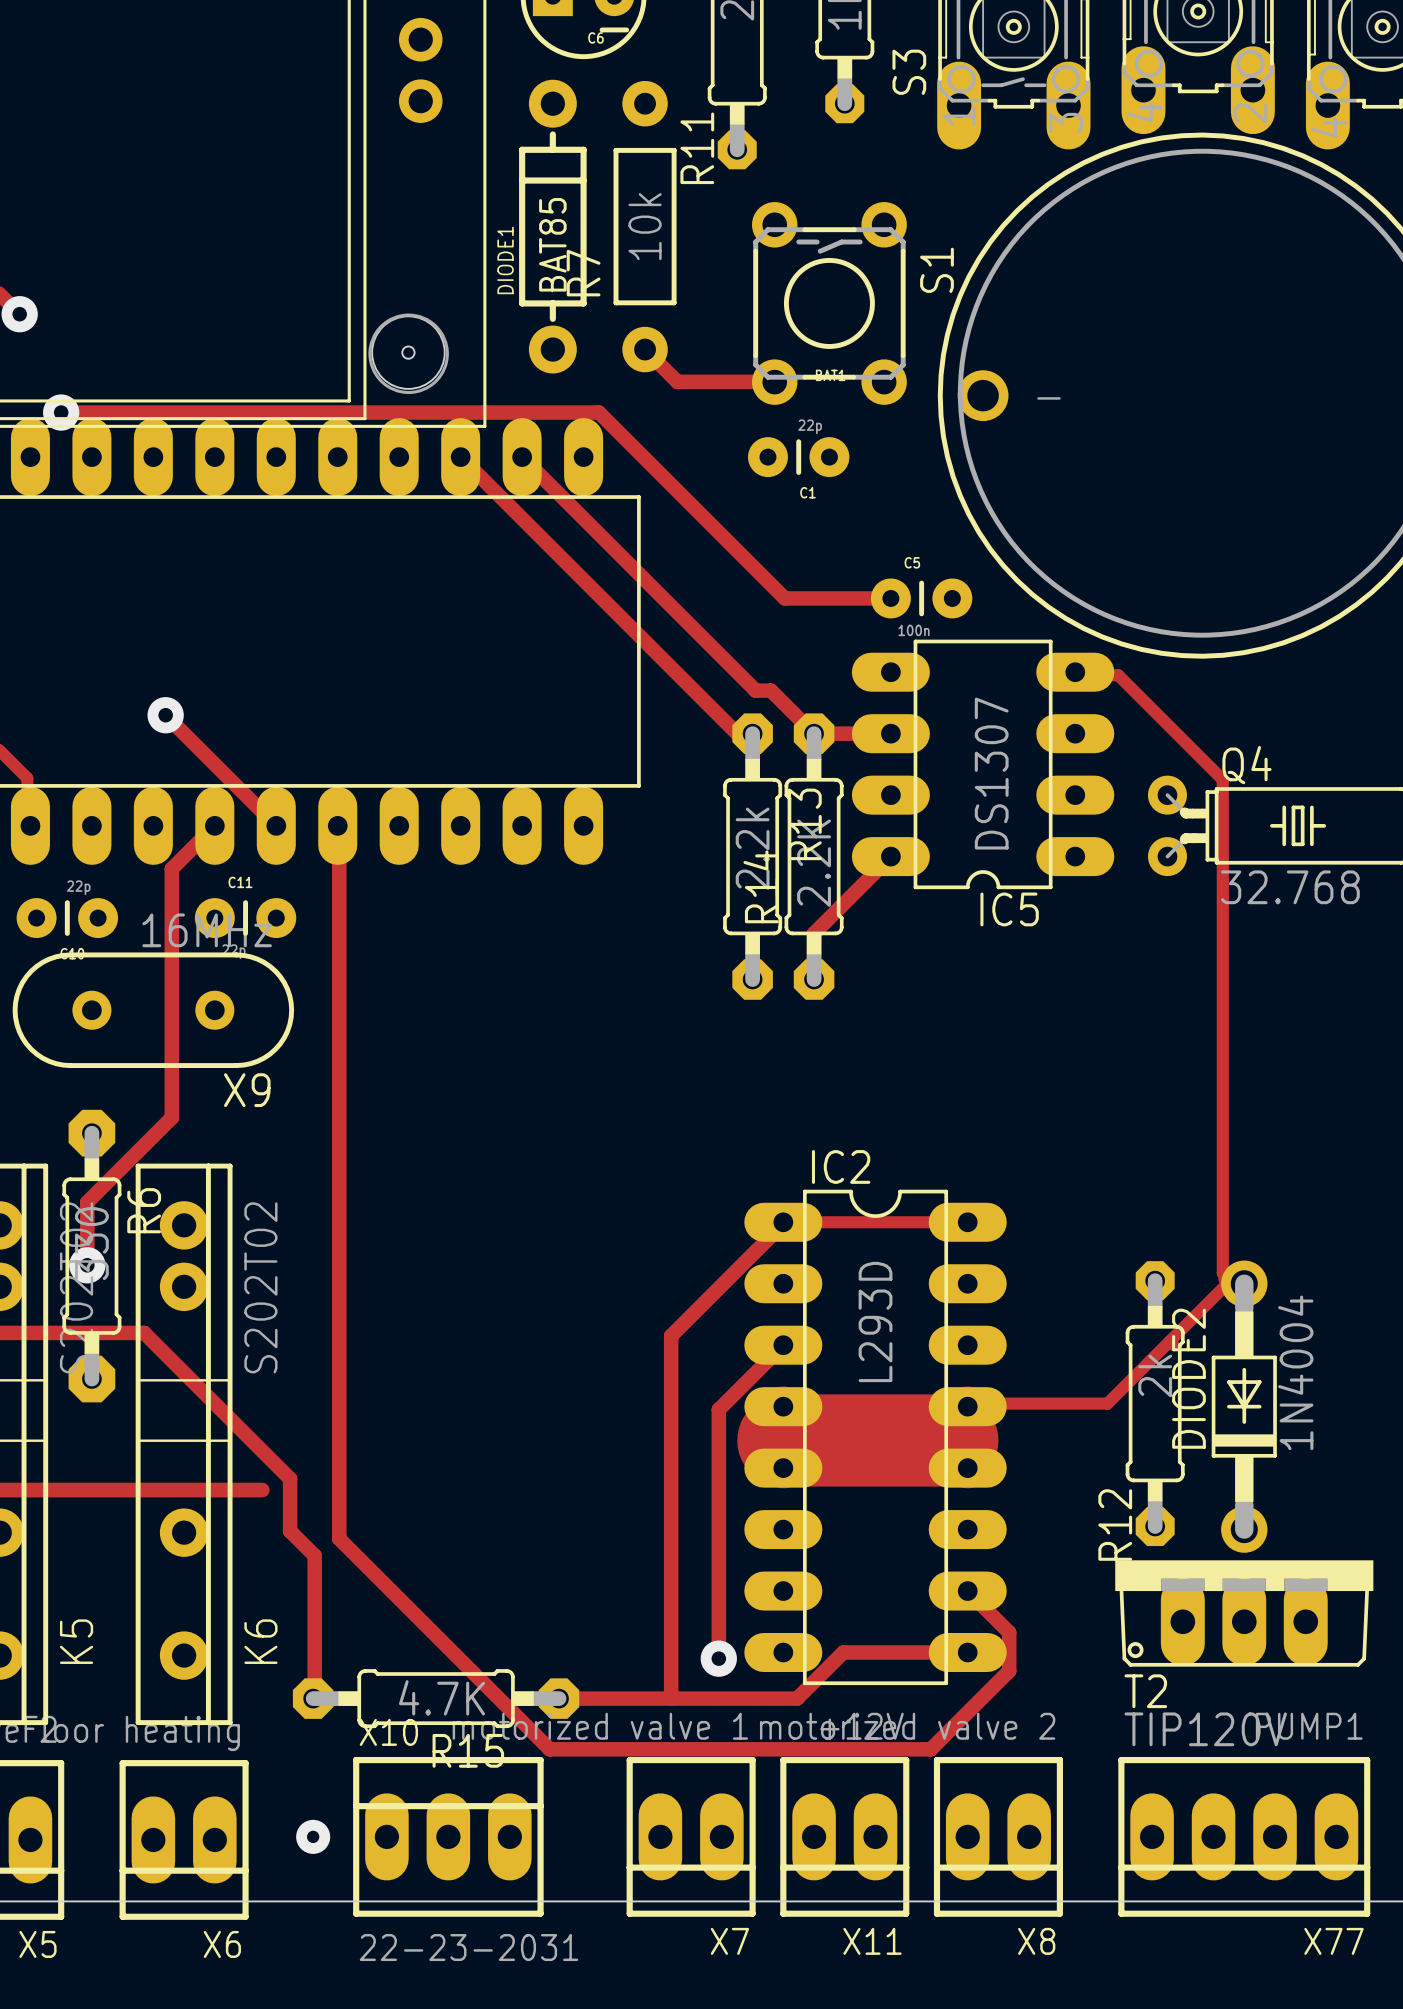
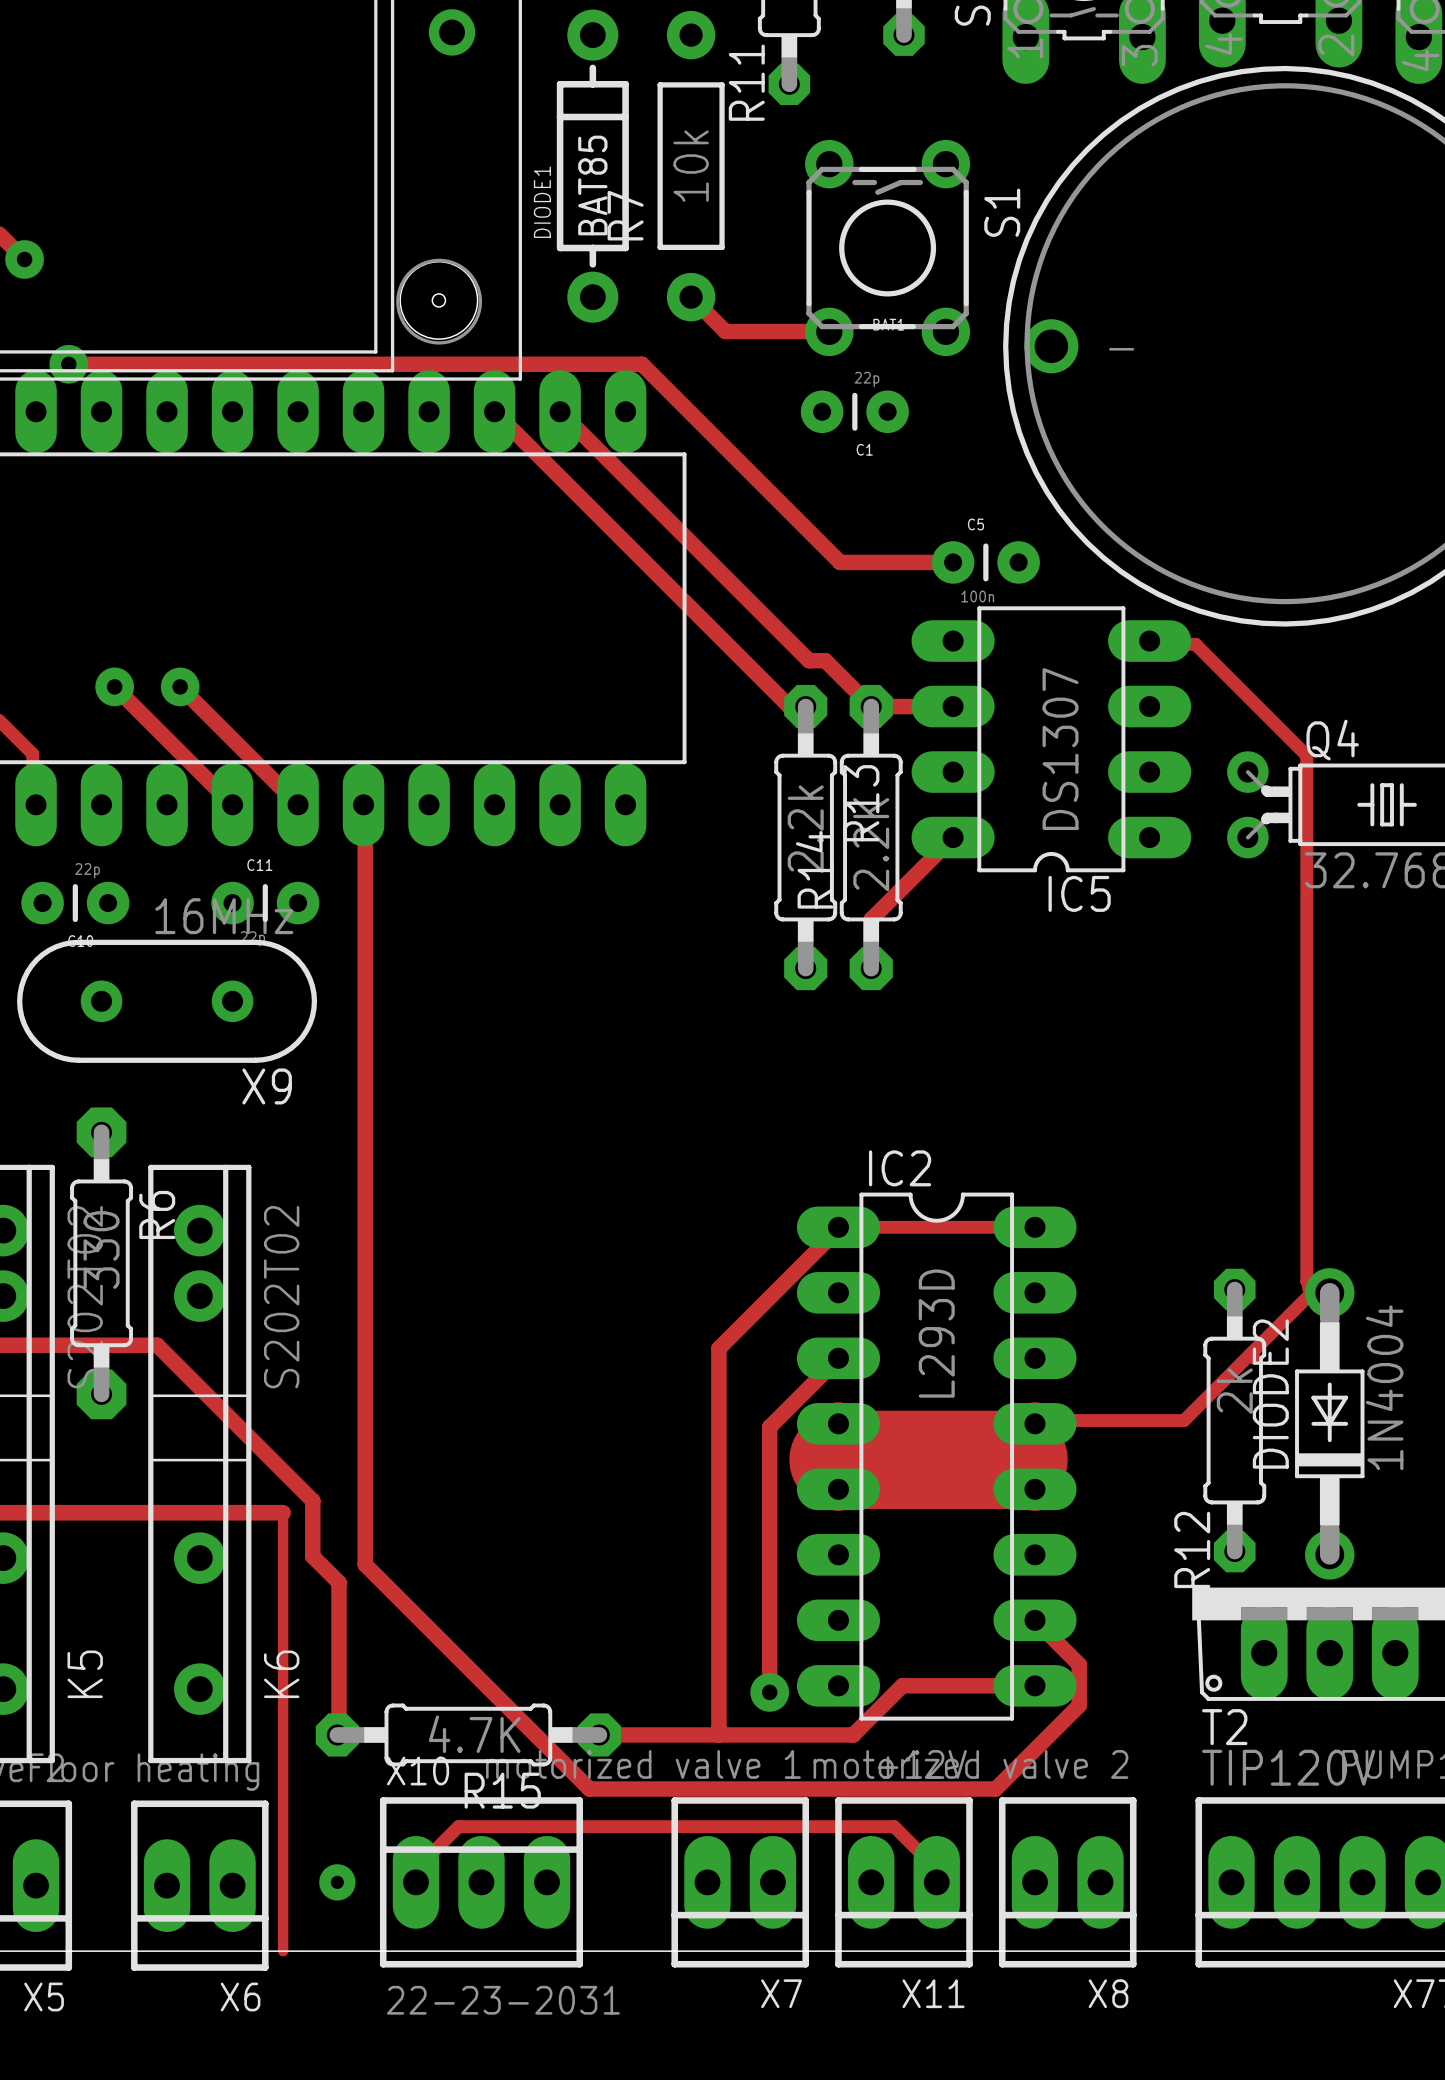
via: none -> (114, 686)
track: (214, 825) (171, 868) (171, 1117) (87, 1202) (87, 1265) -> (232, 804) (114, 686)
via: (87, 1265) -> none
track: none -> (283, 1512) (283, 1951)
track: none -> (415, 1882) (415, 1869) (458, 1826) (894, 1826) (936, 1869) (936, 1882)

